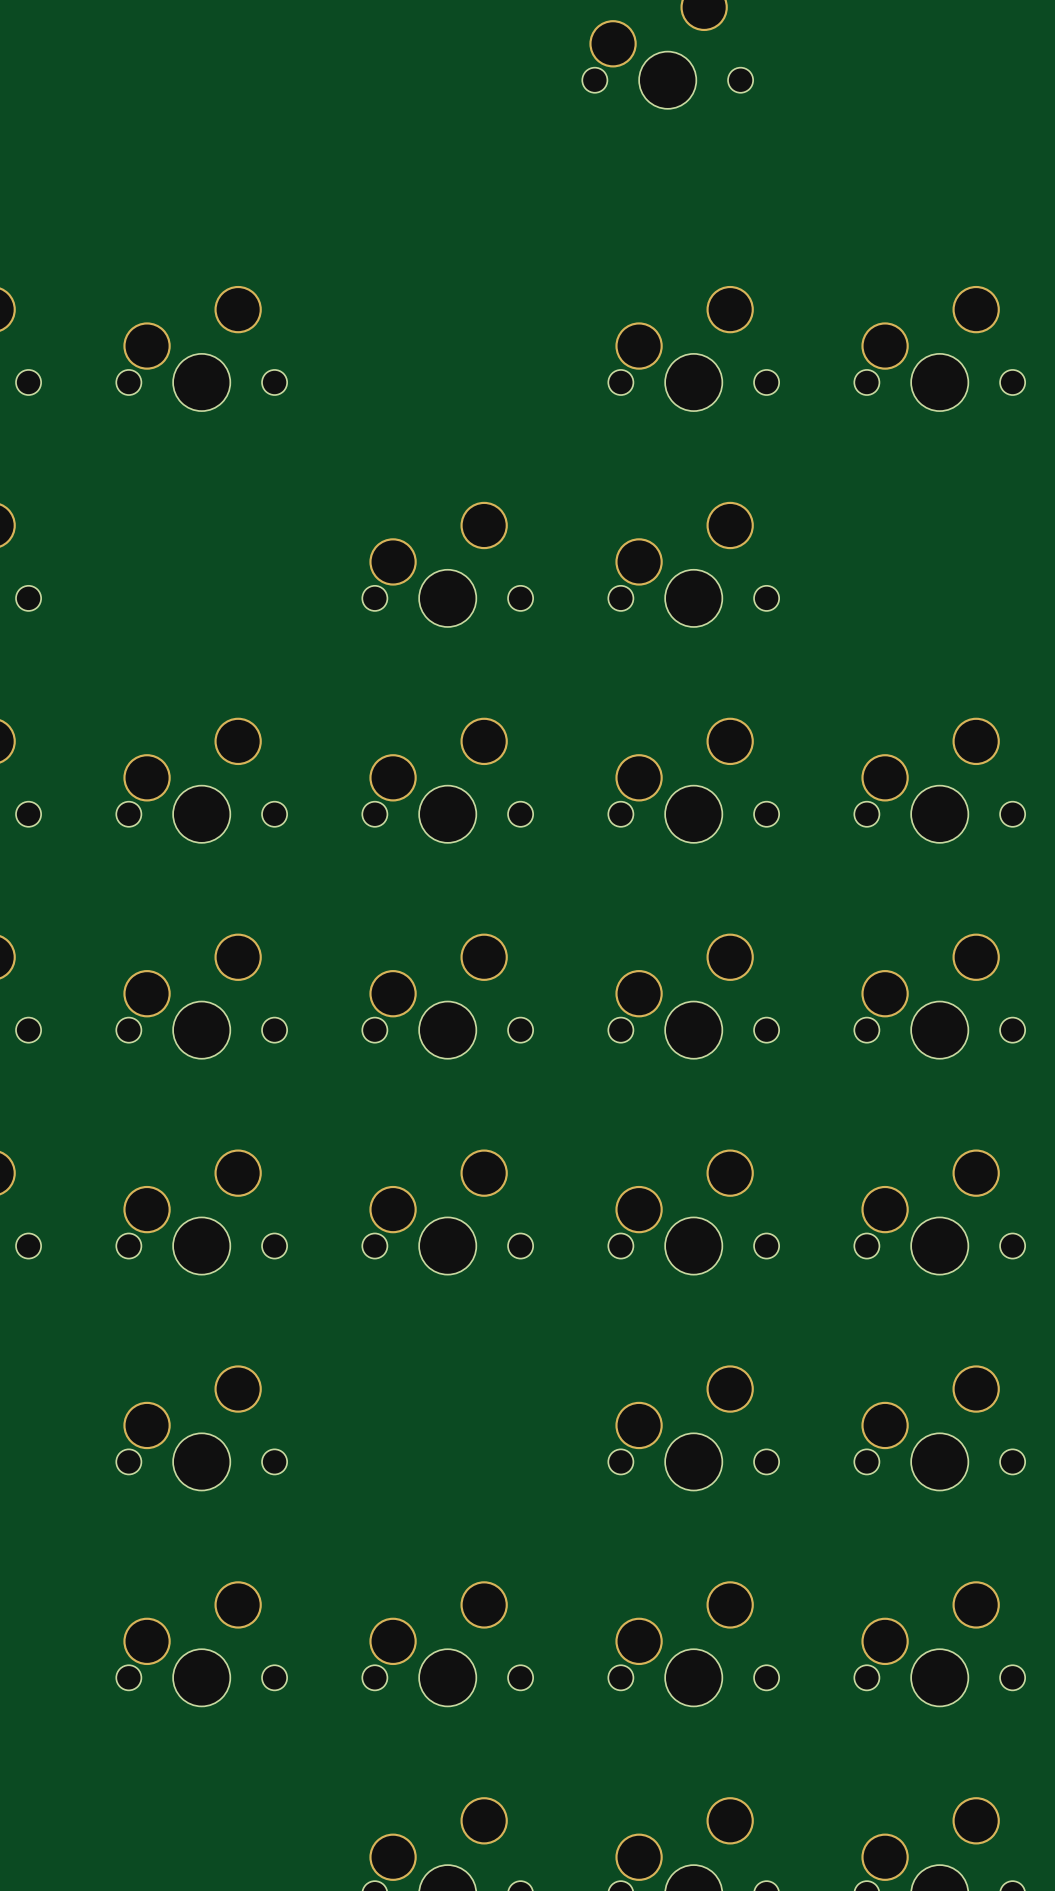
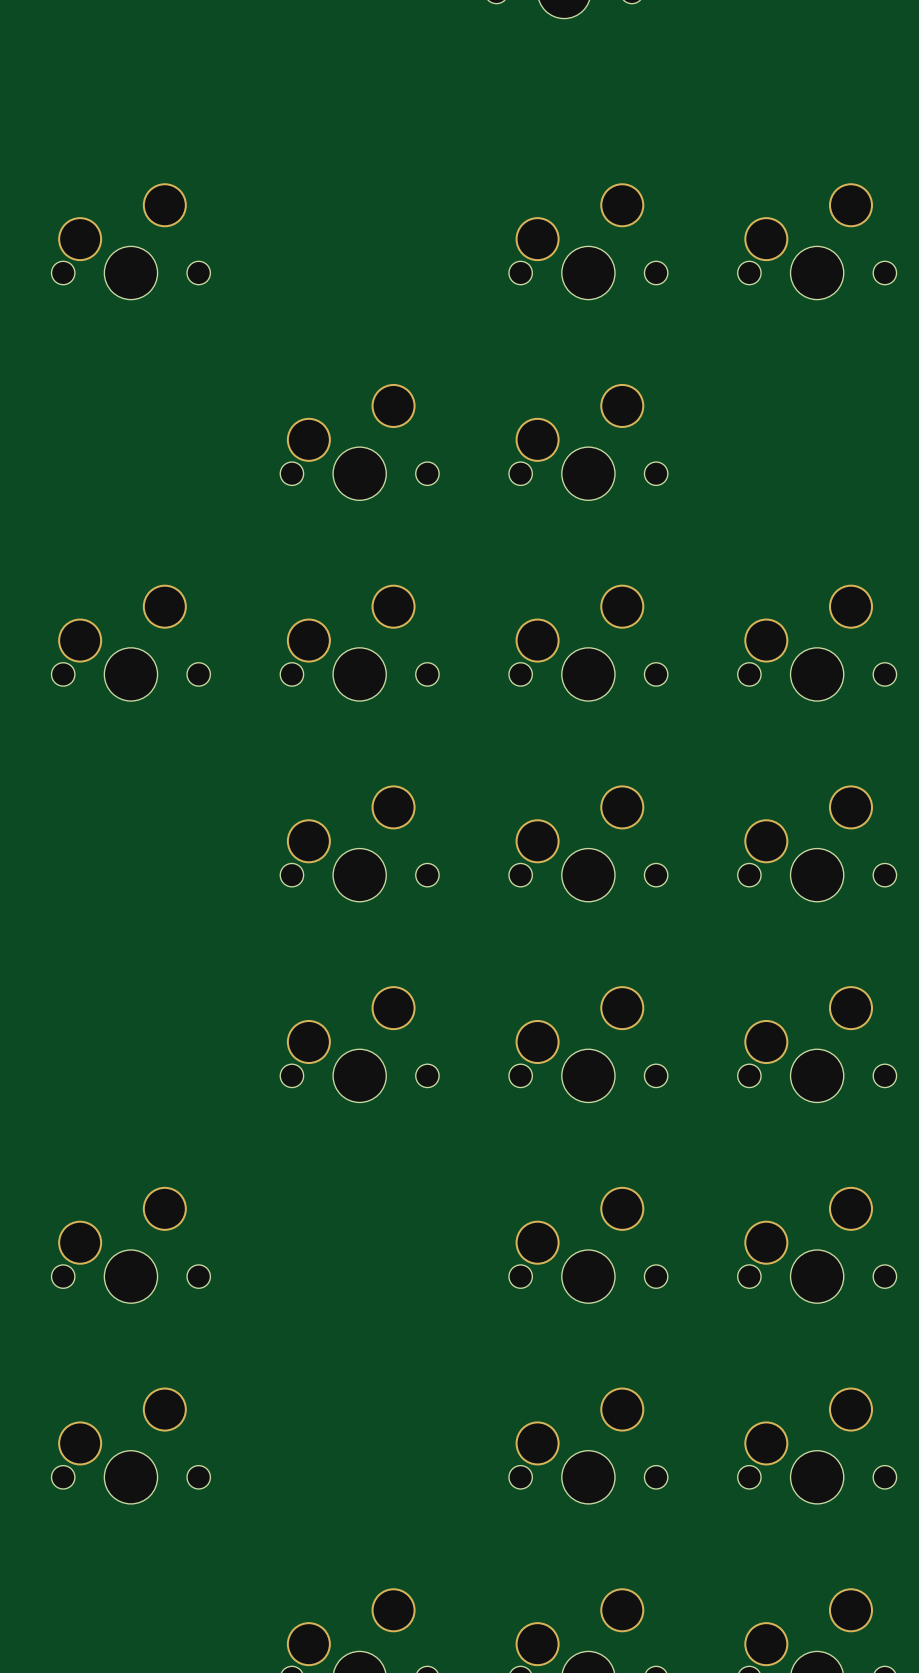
part: (201, 996) -> none
part: (201, 1212) -> none
part: (447, 1643) -> none

